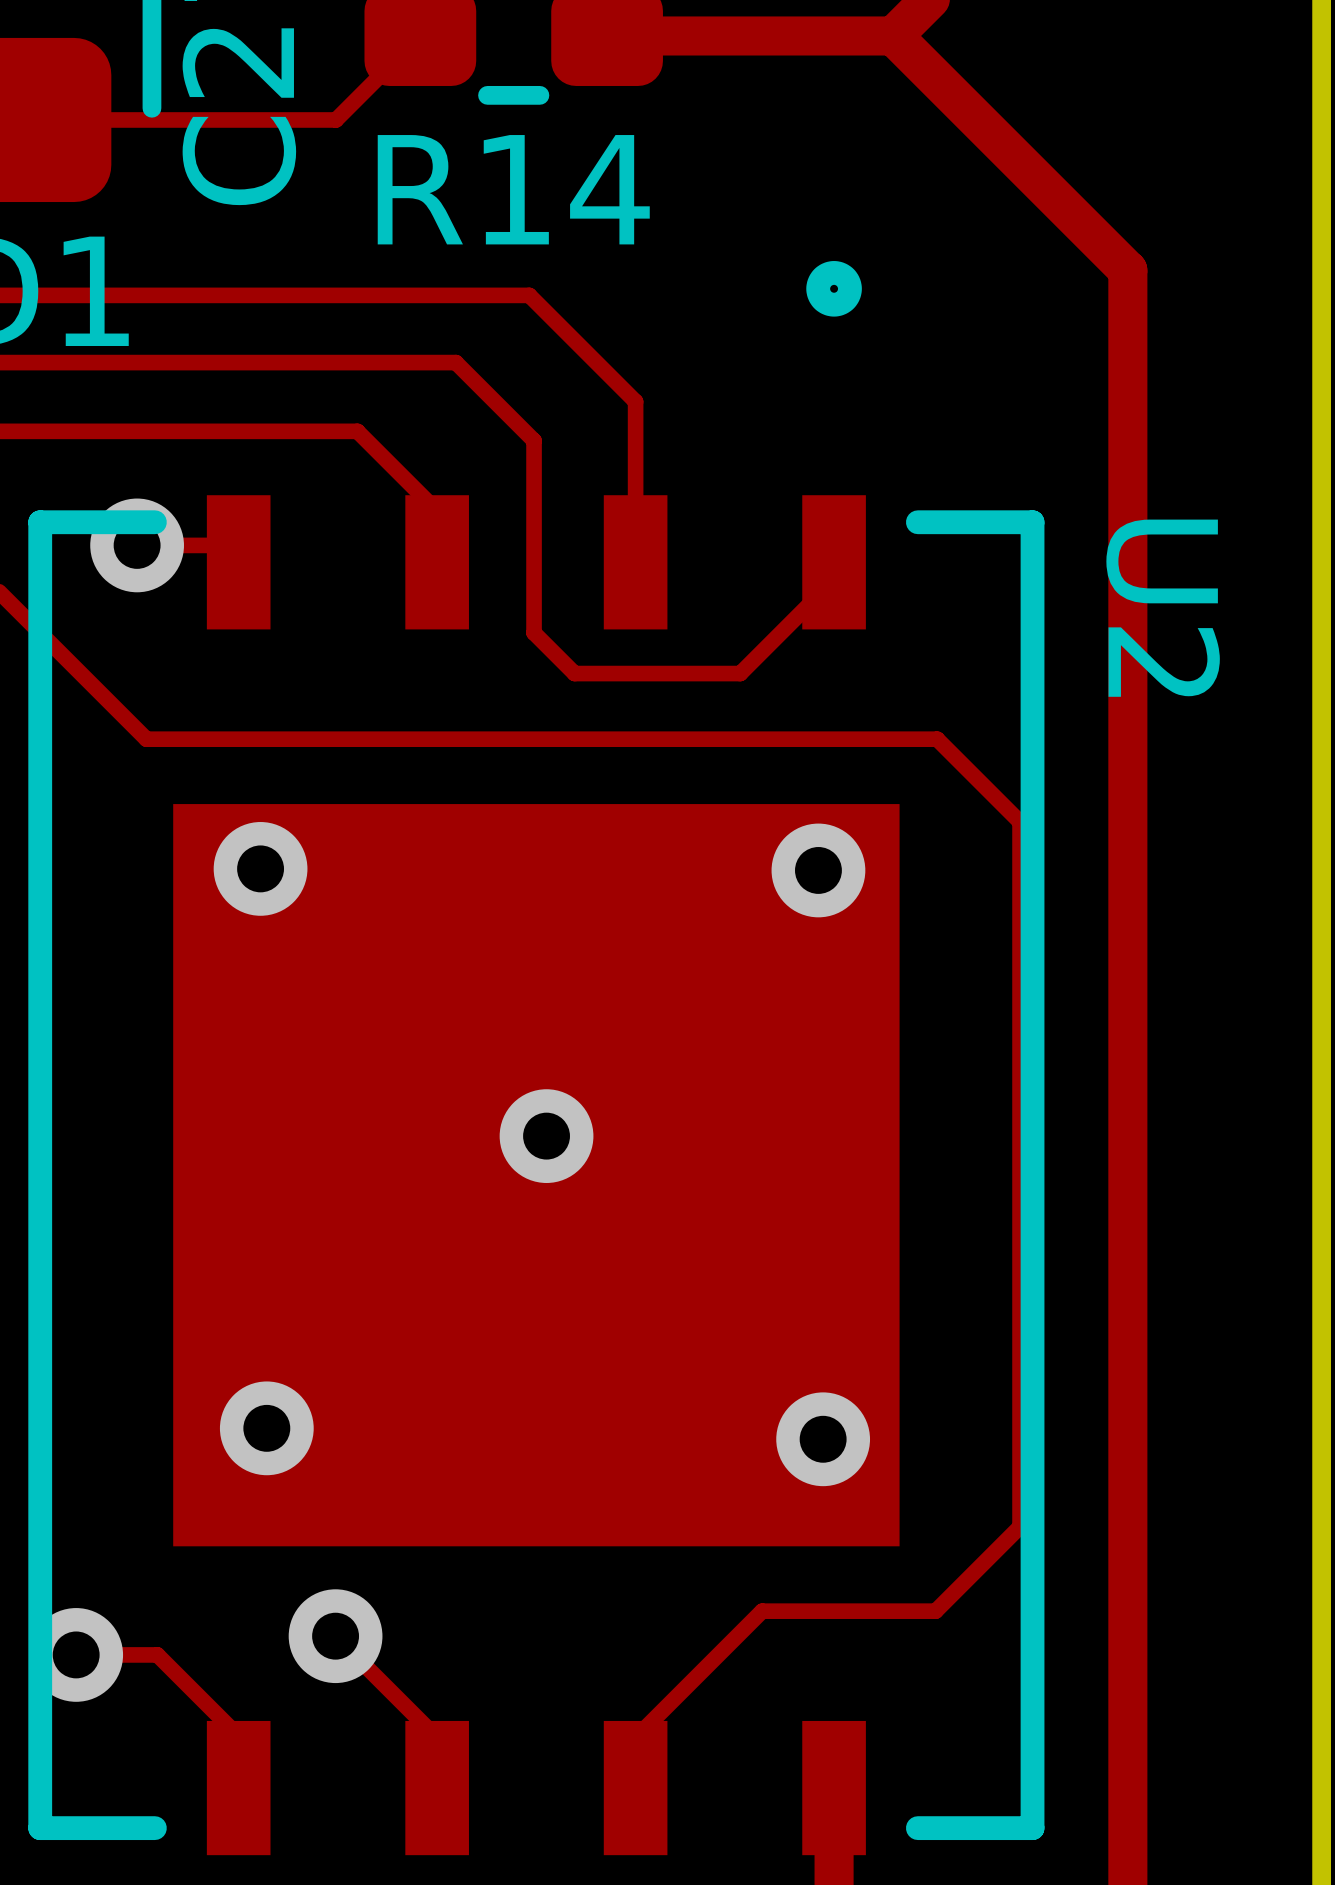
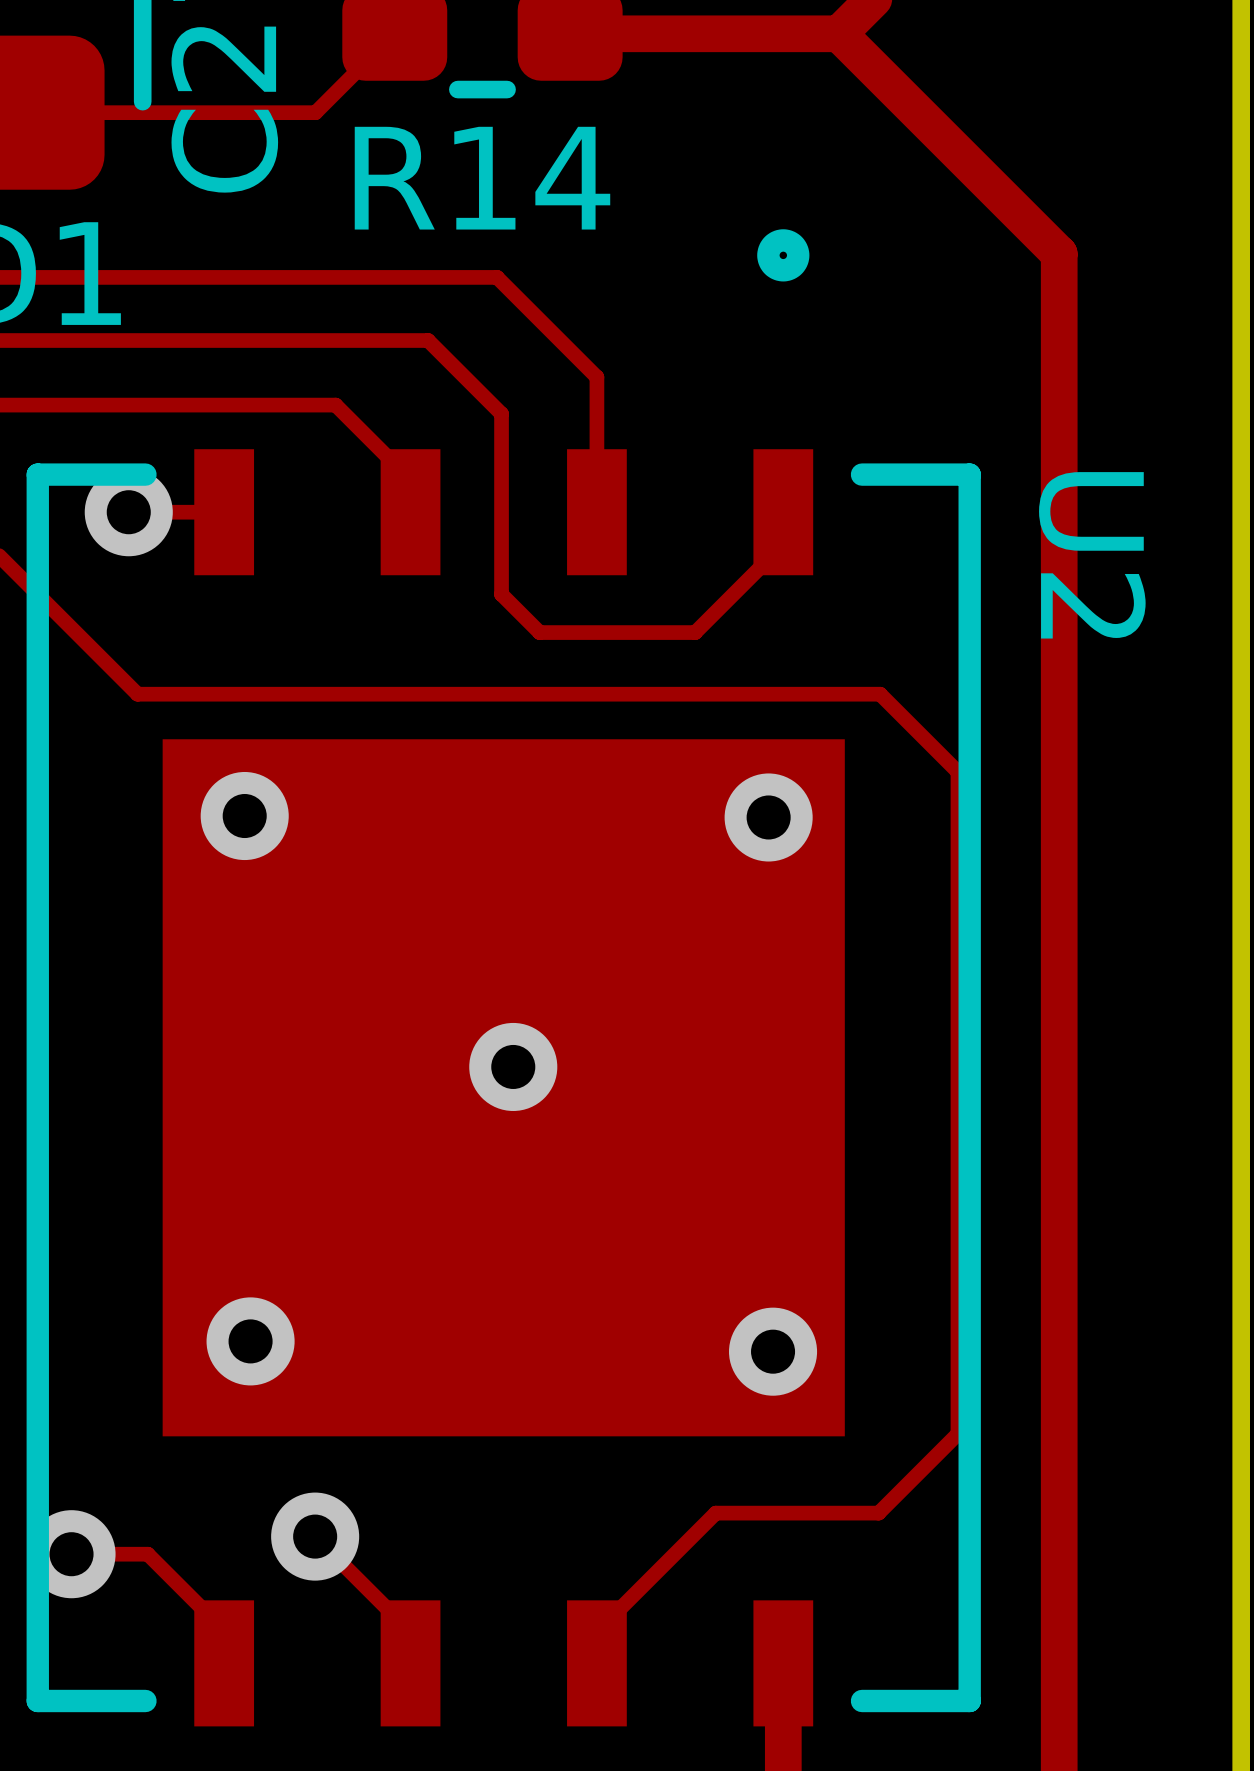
U2 position: (536, 1058) -> (503, 977)

